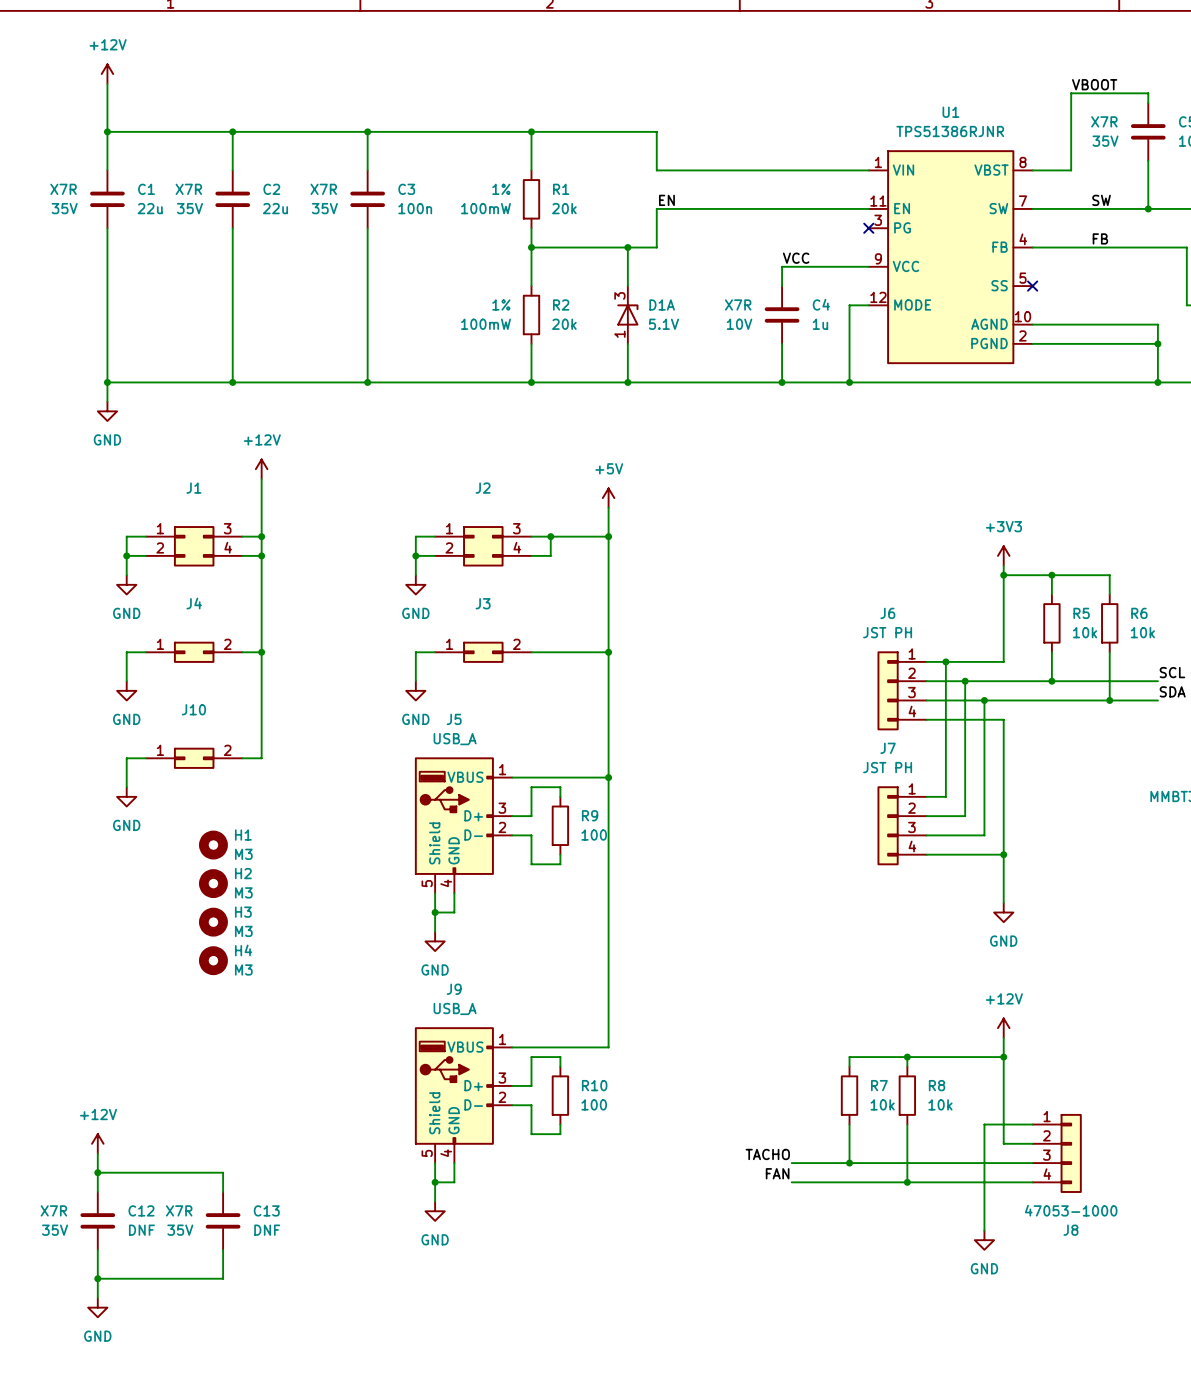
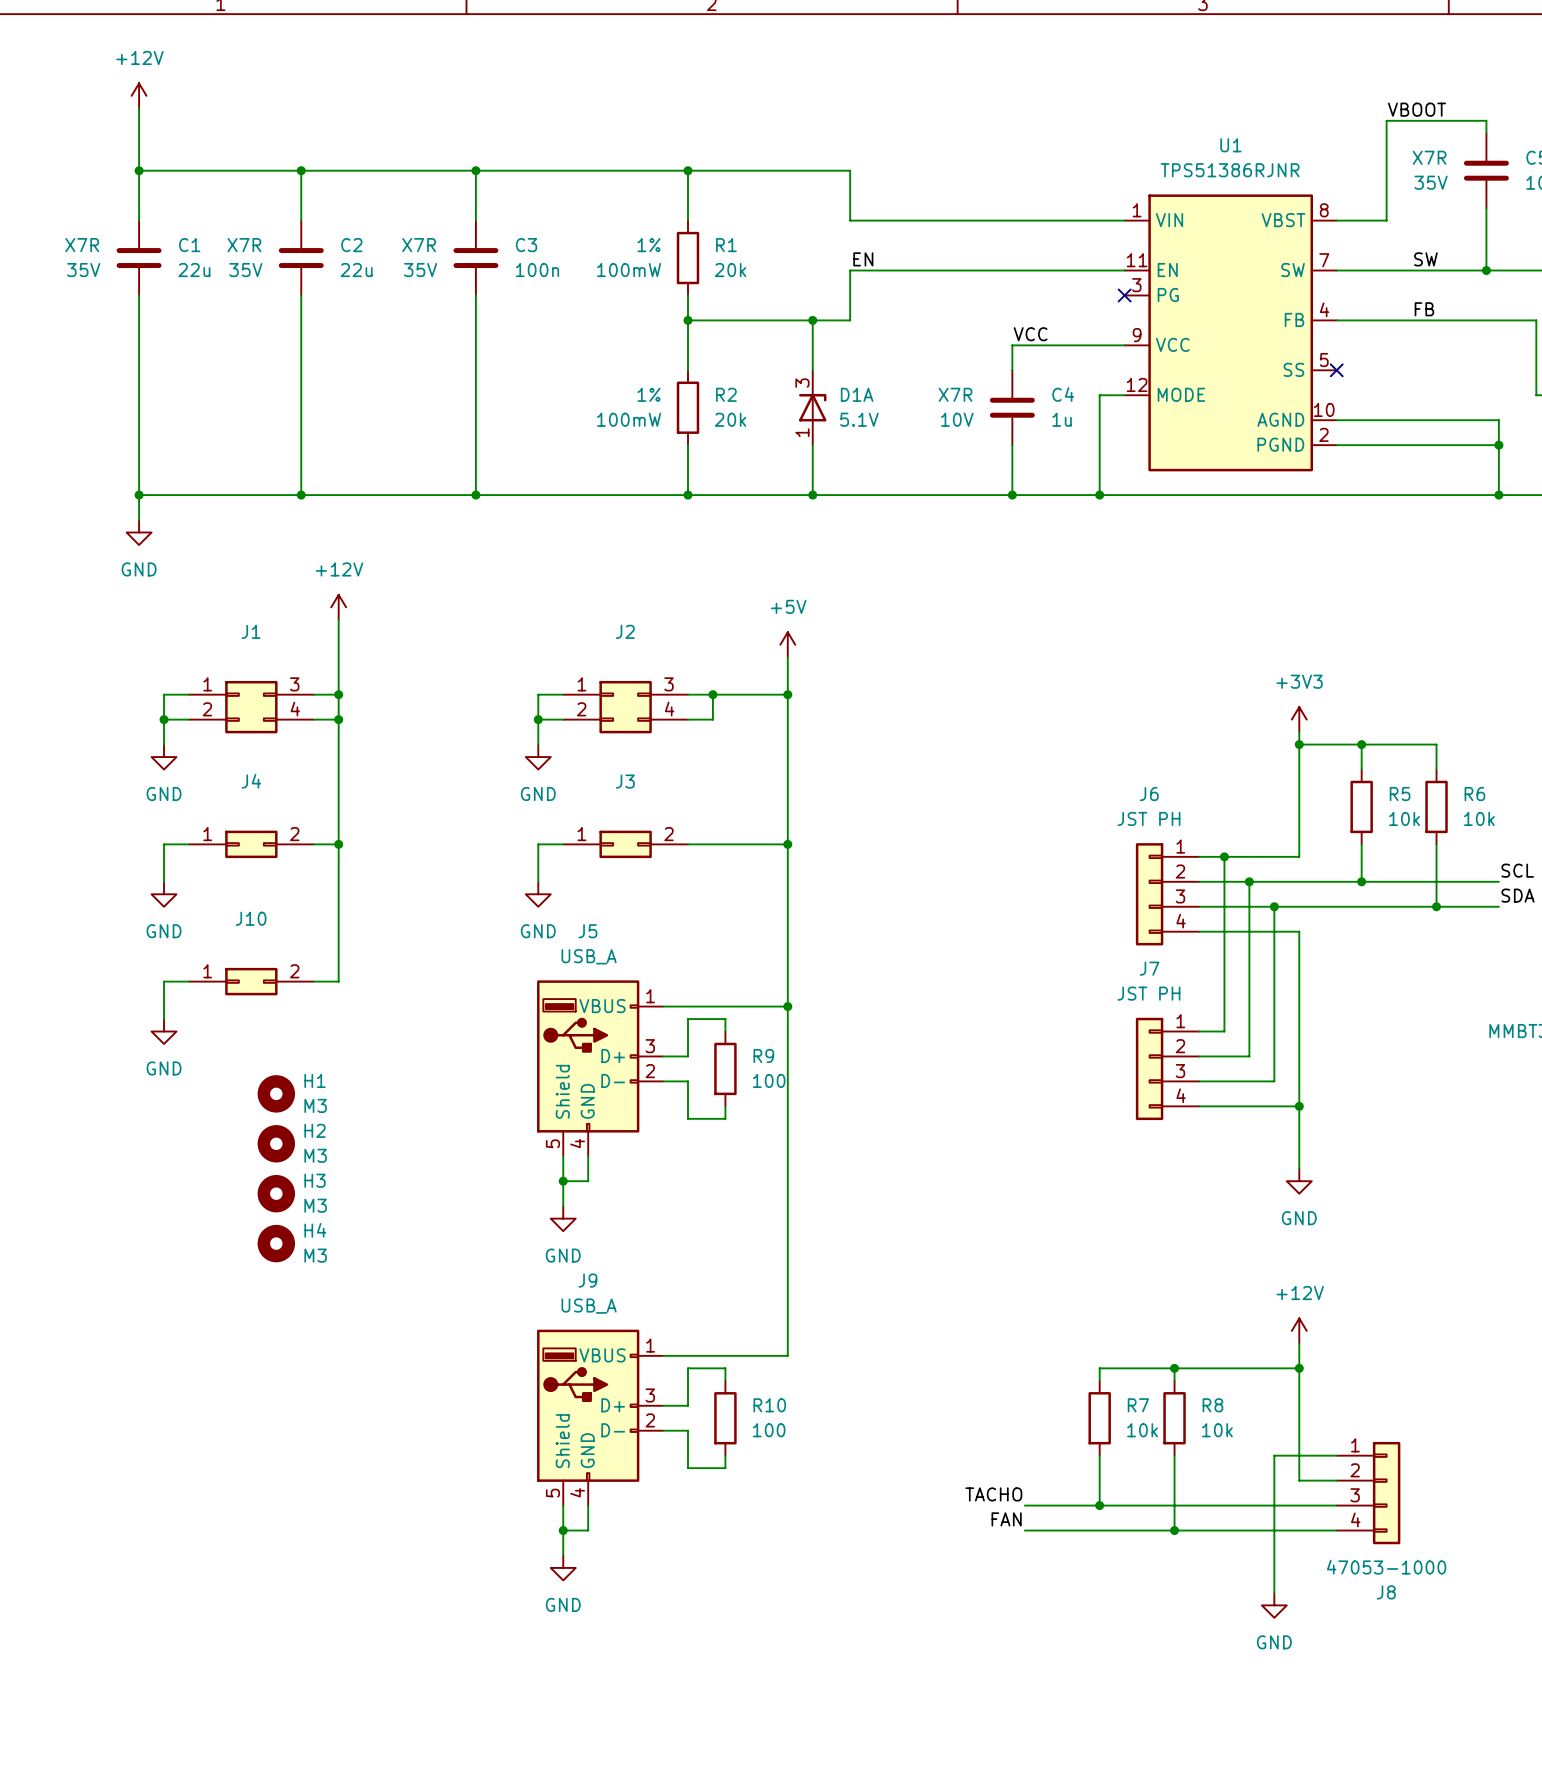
power symbol: +12V (97, 1143) -> none
wire: (97, 1153) (97, 1191) -> none
wire: (97, 1172) (223, 1172) (223, 1191) -> none
junction: (97, 1172) -> none
C12: DNF (97, 1220) -> none
C13: DNF (223, 1220) -> none
wire: (97, 1249) (97, 1298) -> none
wire: (223, 1249) (223, 1278) (97, 1278) -> none
junction: (97, 1278) -> none
power symbol: GND (97, 1307) -> none

